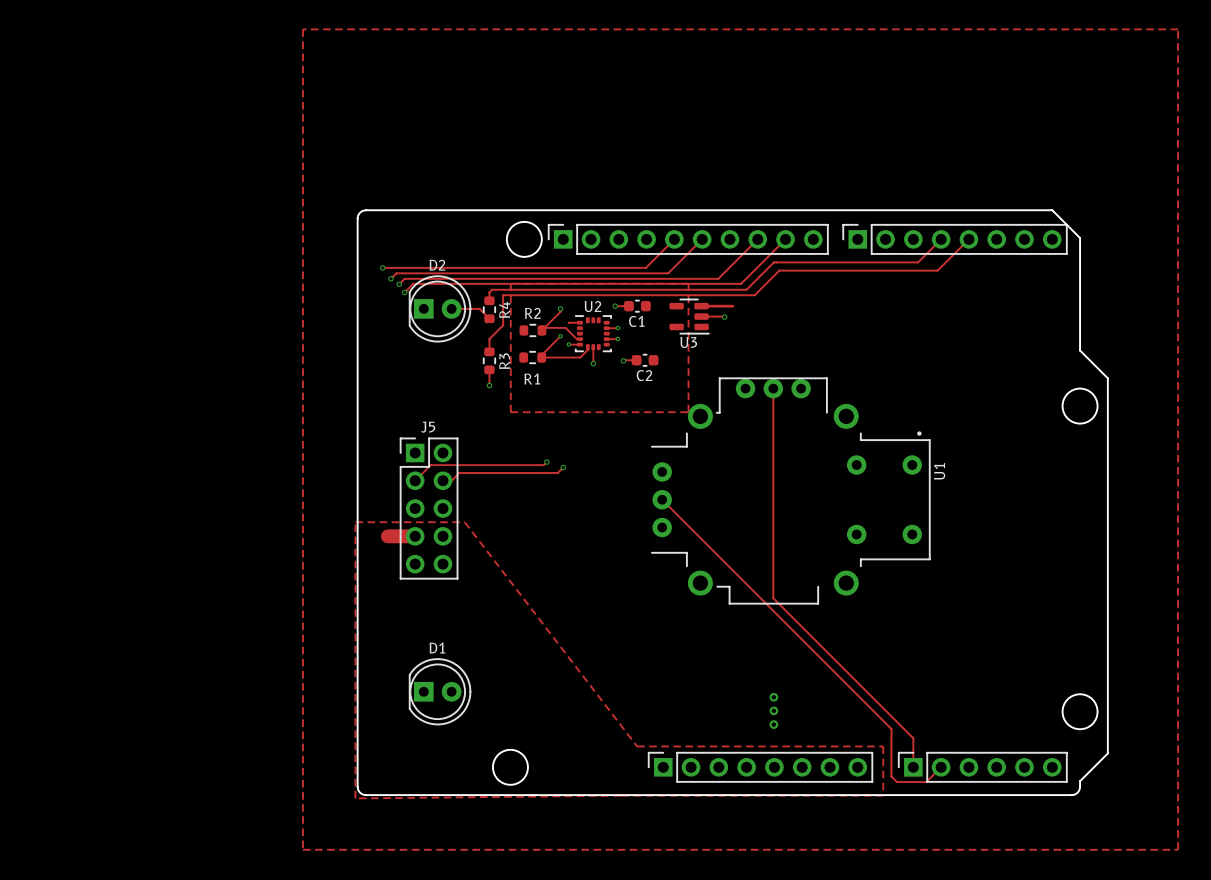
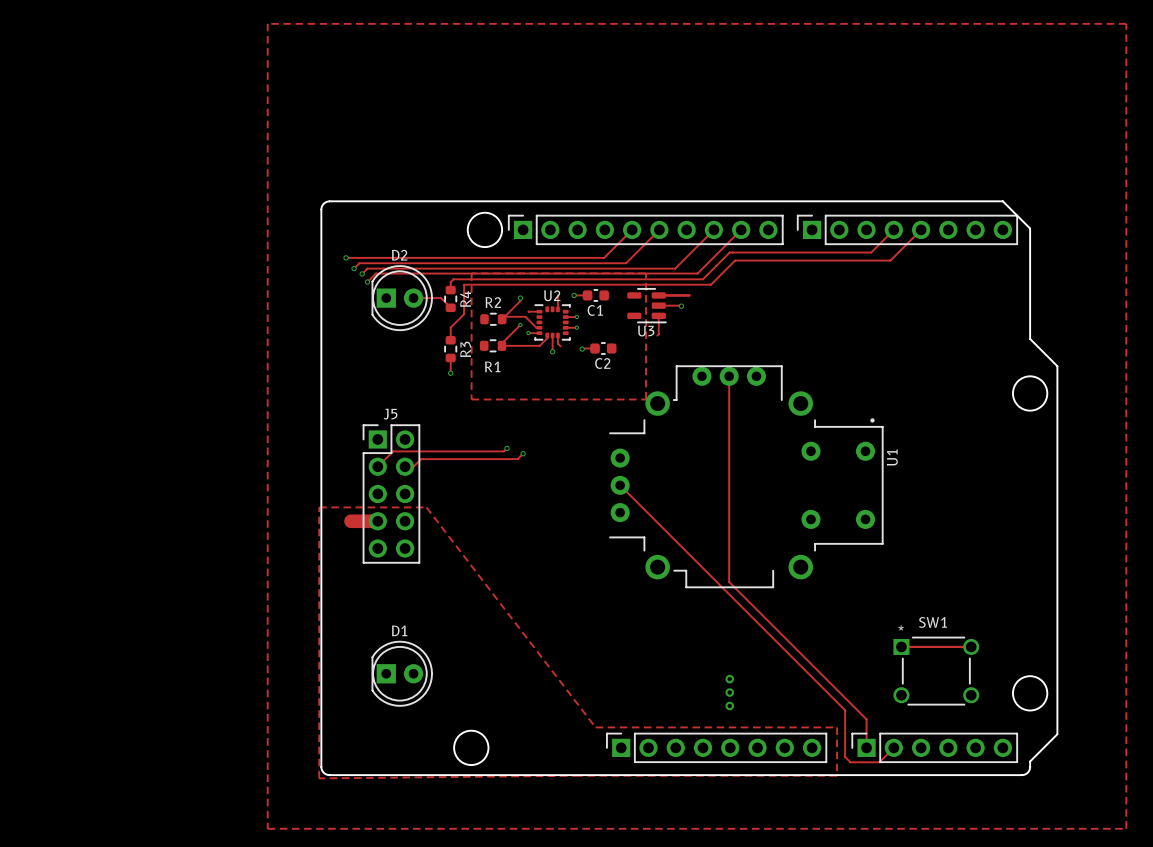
track: none -> (557, 295) (557, 309)
track: none -> (658, 315) (657, 335)
track: none -> (557, 335) (557, 343) (560, 346)
track: none -> (901, 646) (971, 646)
SW1: none -> (936, 671)

